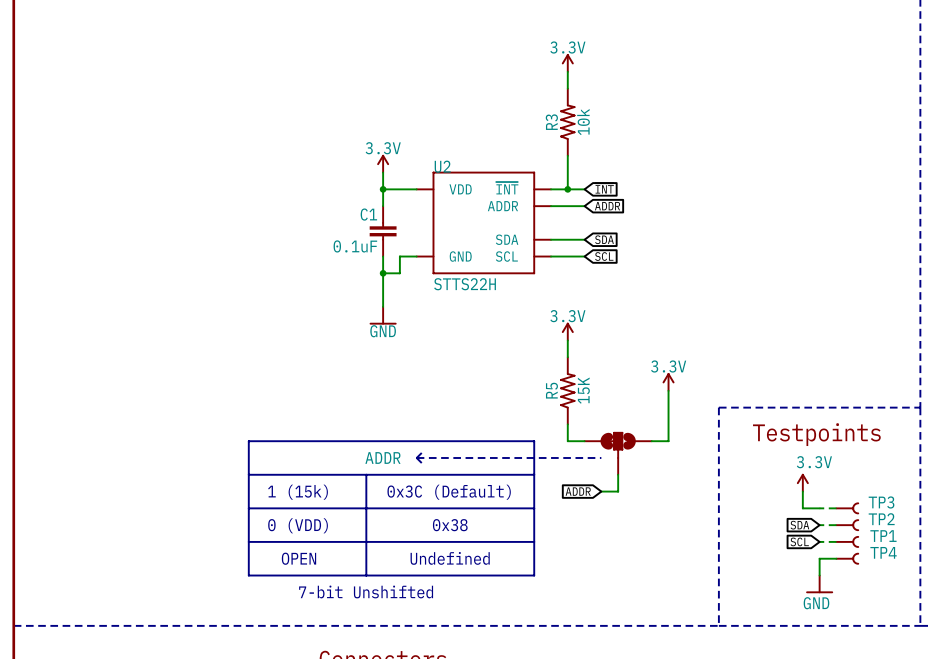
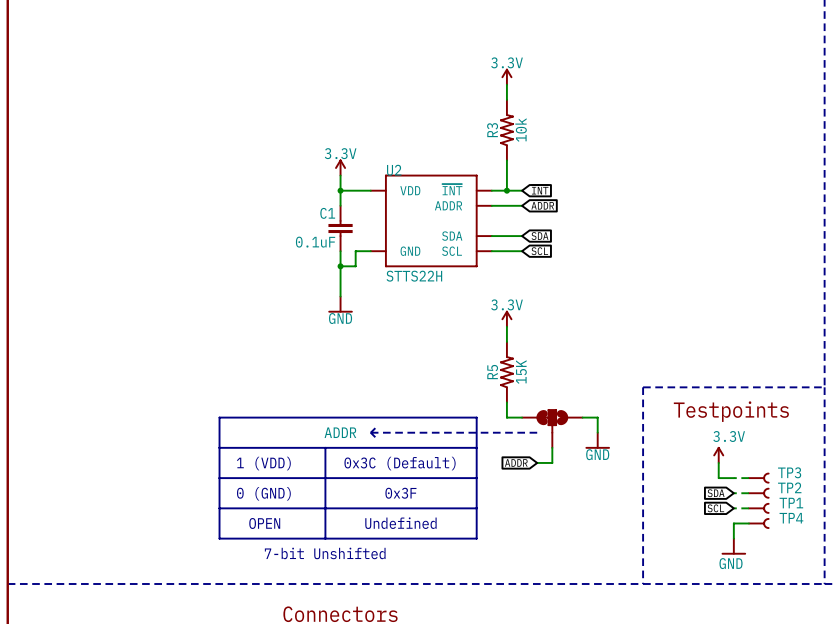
power symbol: 3.3V (668, 382) -> none
wire: (668, 390) (668, 441) -> (597, 432) (597, 417)
power symbol: none -> GND (597, 440)
text: 1 (15k) (298, 492) -> 1 (VDD) (263, 463)
text: 0 (VDD) (298, 525) -> 0 (GND) (263, 493)
text: 0x38 (450, 525) -> 0x3F (400, 493)

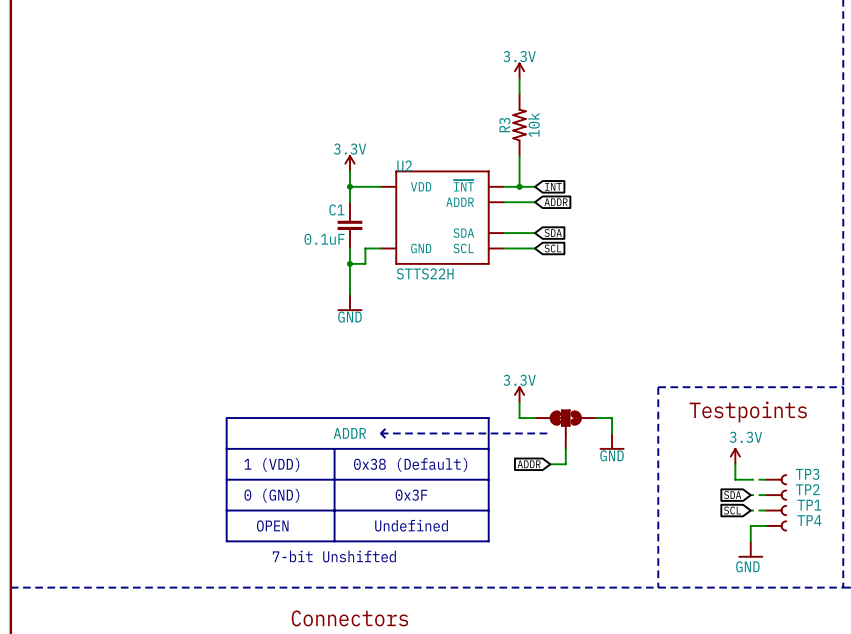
power symbol position: 3.3V (506, 318) -> 3.3V (519, 394)
wire: (506, 326) (506, 341) -> none
R5: 15K (506, 372) -> none
text: 0x3C (Default) (400, 463) -> 0x38 (Default) (410, 464)

